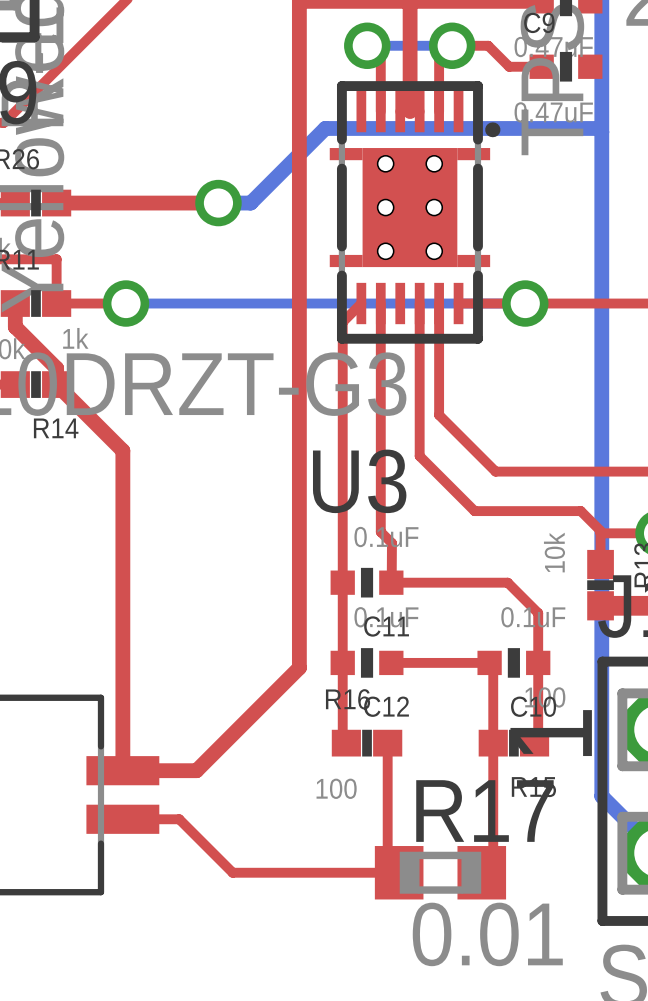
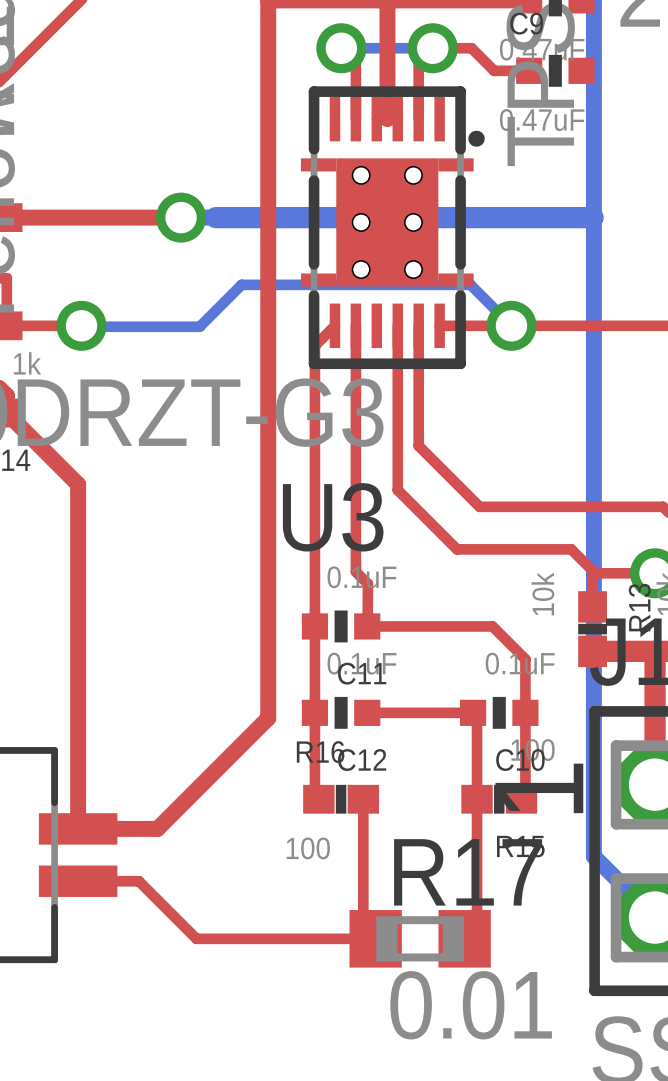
bottom track: (601, 132) (598, 128) (325, 128) (250, 203) -> (593, 218) (215, 217)
bottom track: (126, 303) (525, 303) -> (81, 326) (199, 326) (241, 284) (470, 284) (511, 325)

